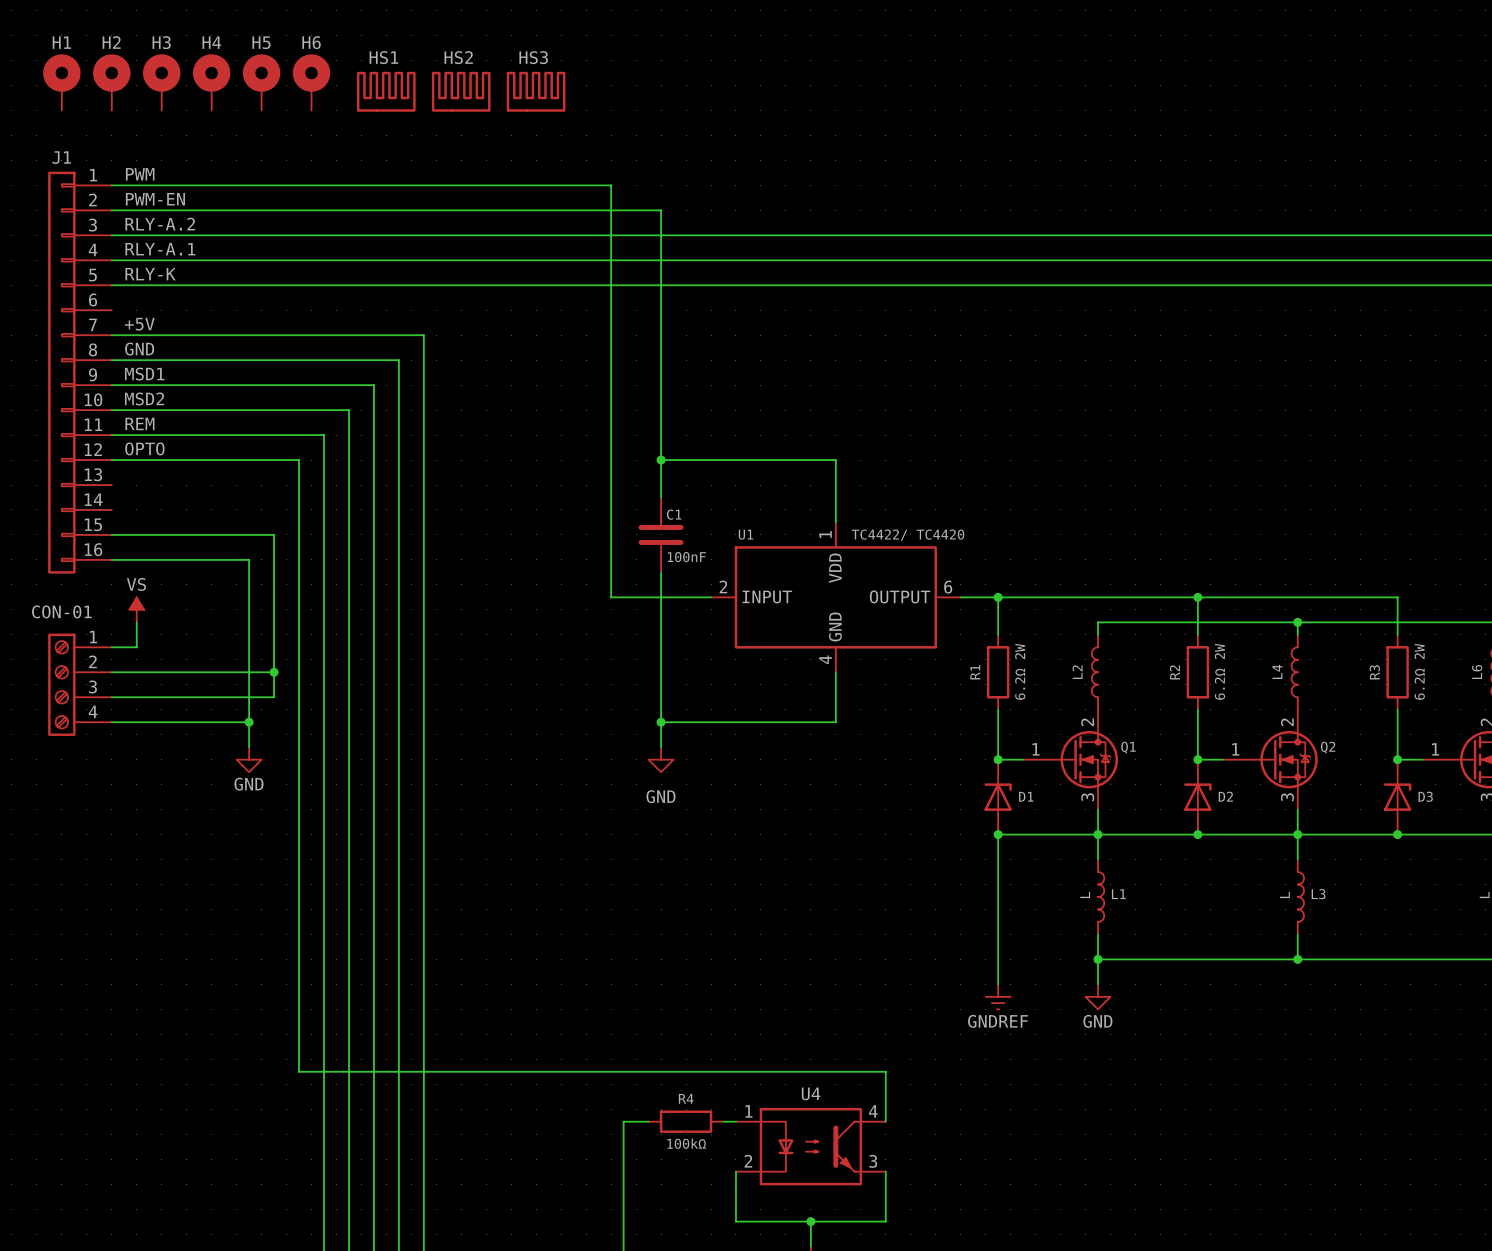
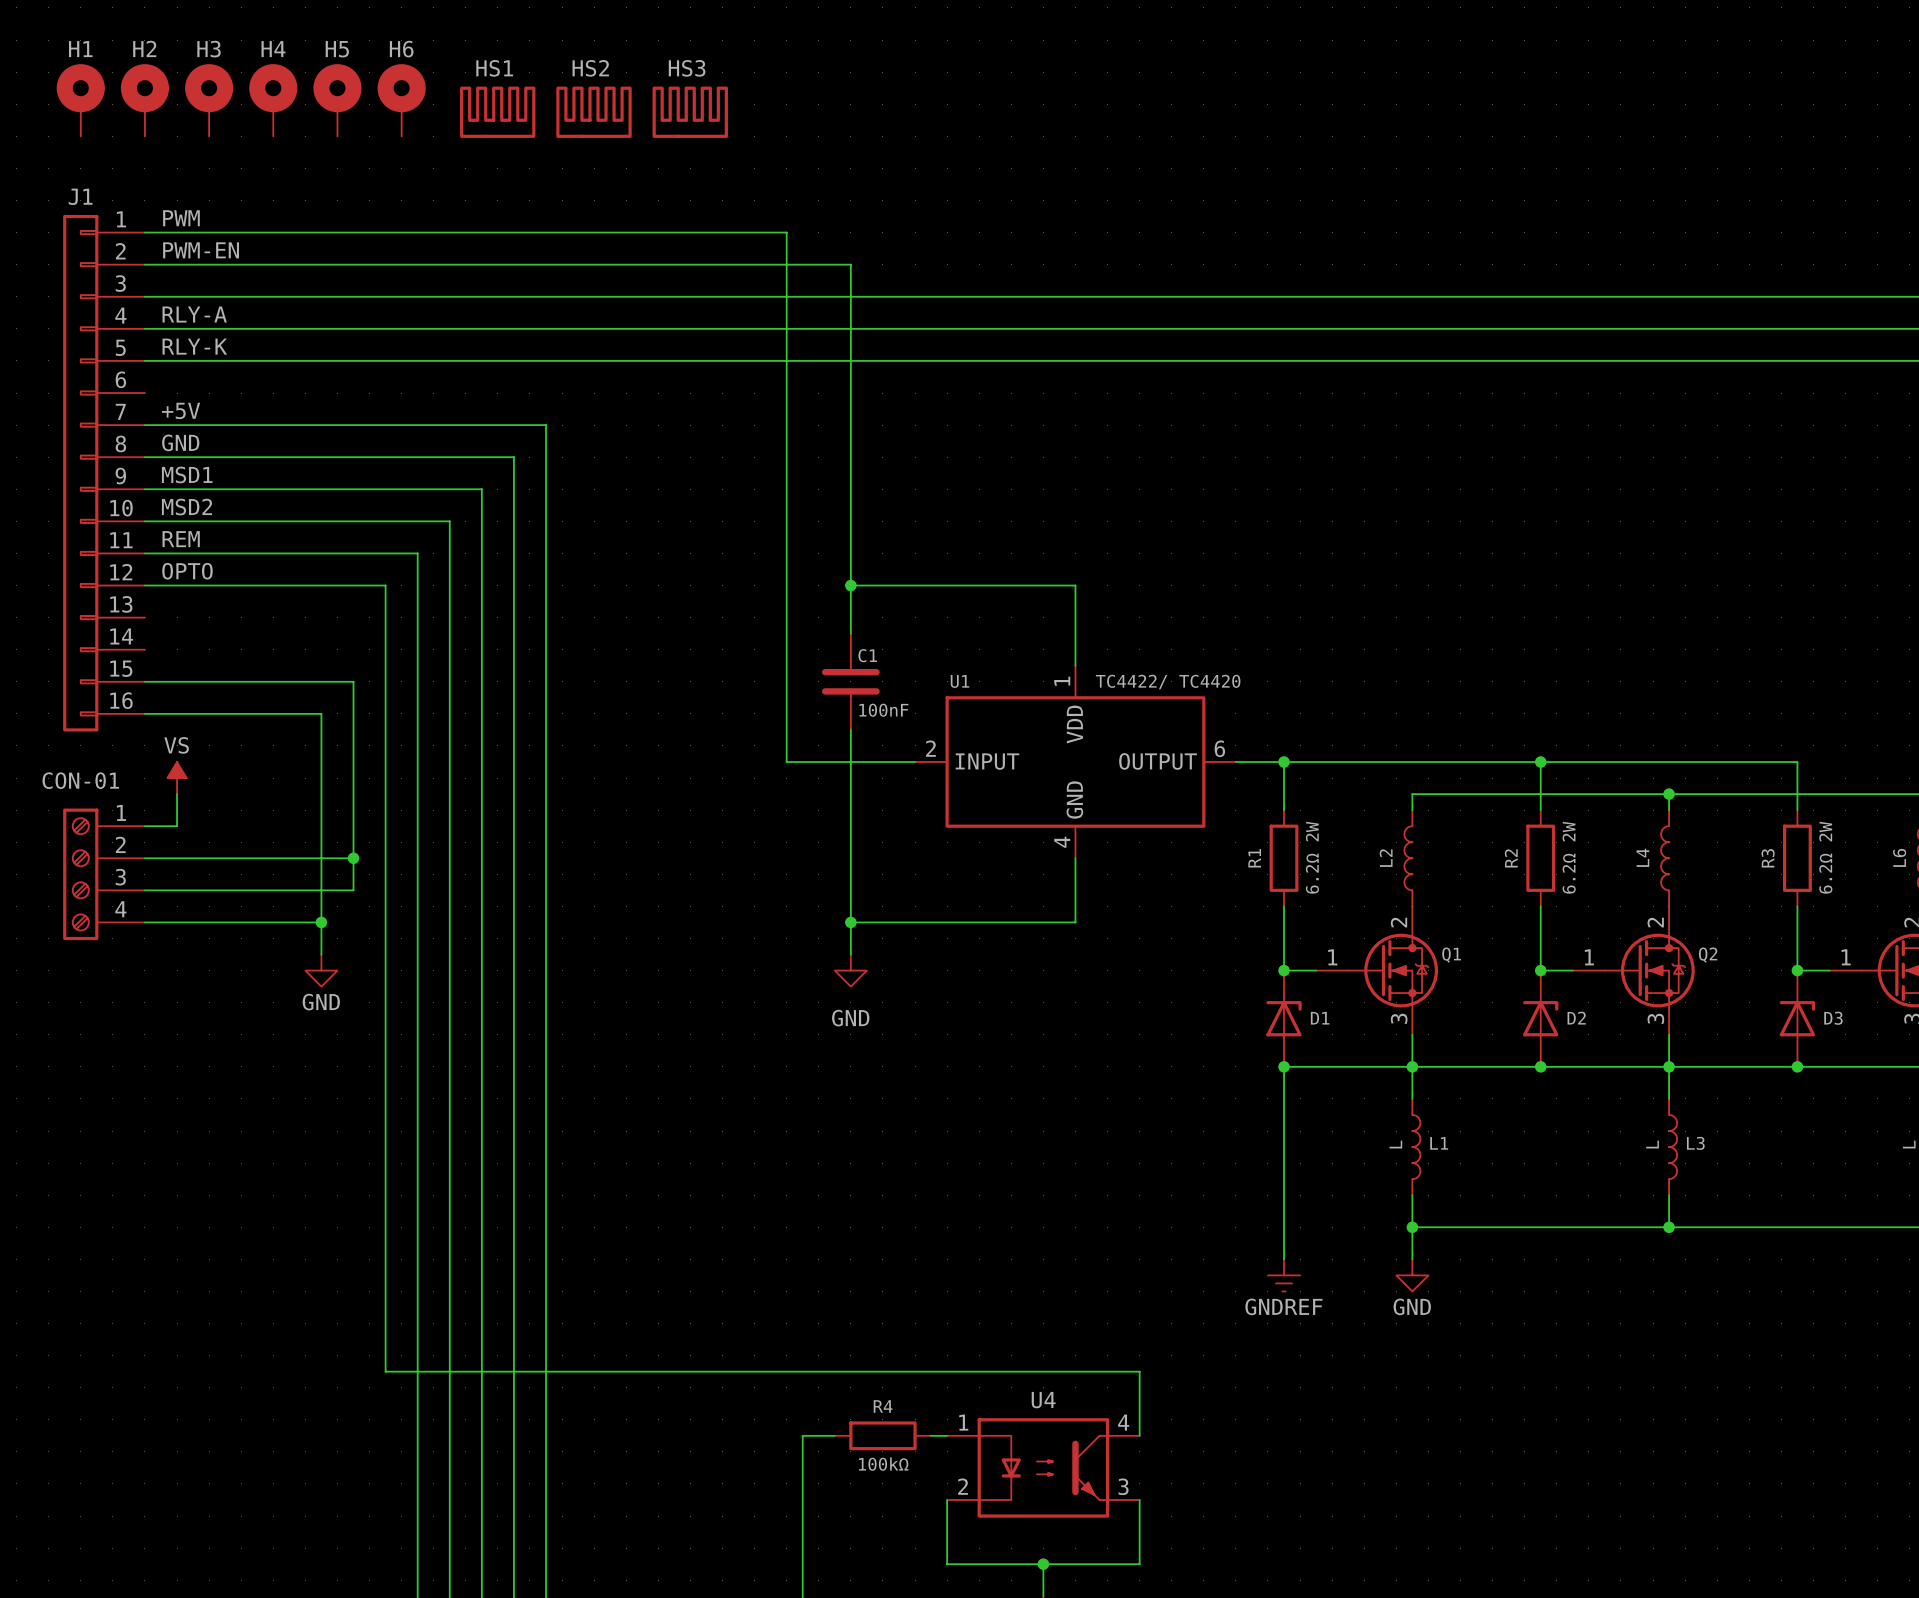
label: RLY-A.2 (160, 224) -> none
label: RLY-A.1 (160, 249) -> RLY-A (194, 314)

